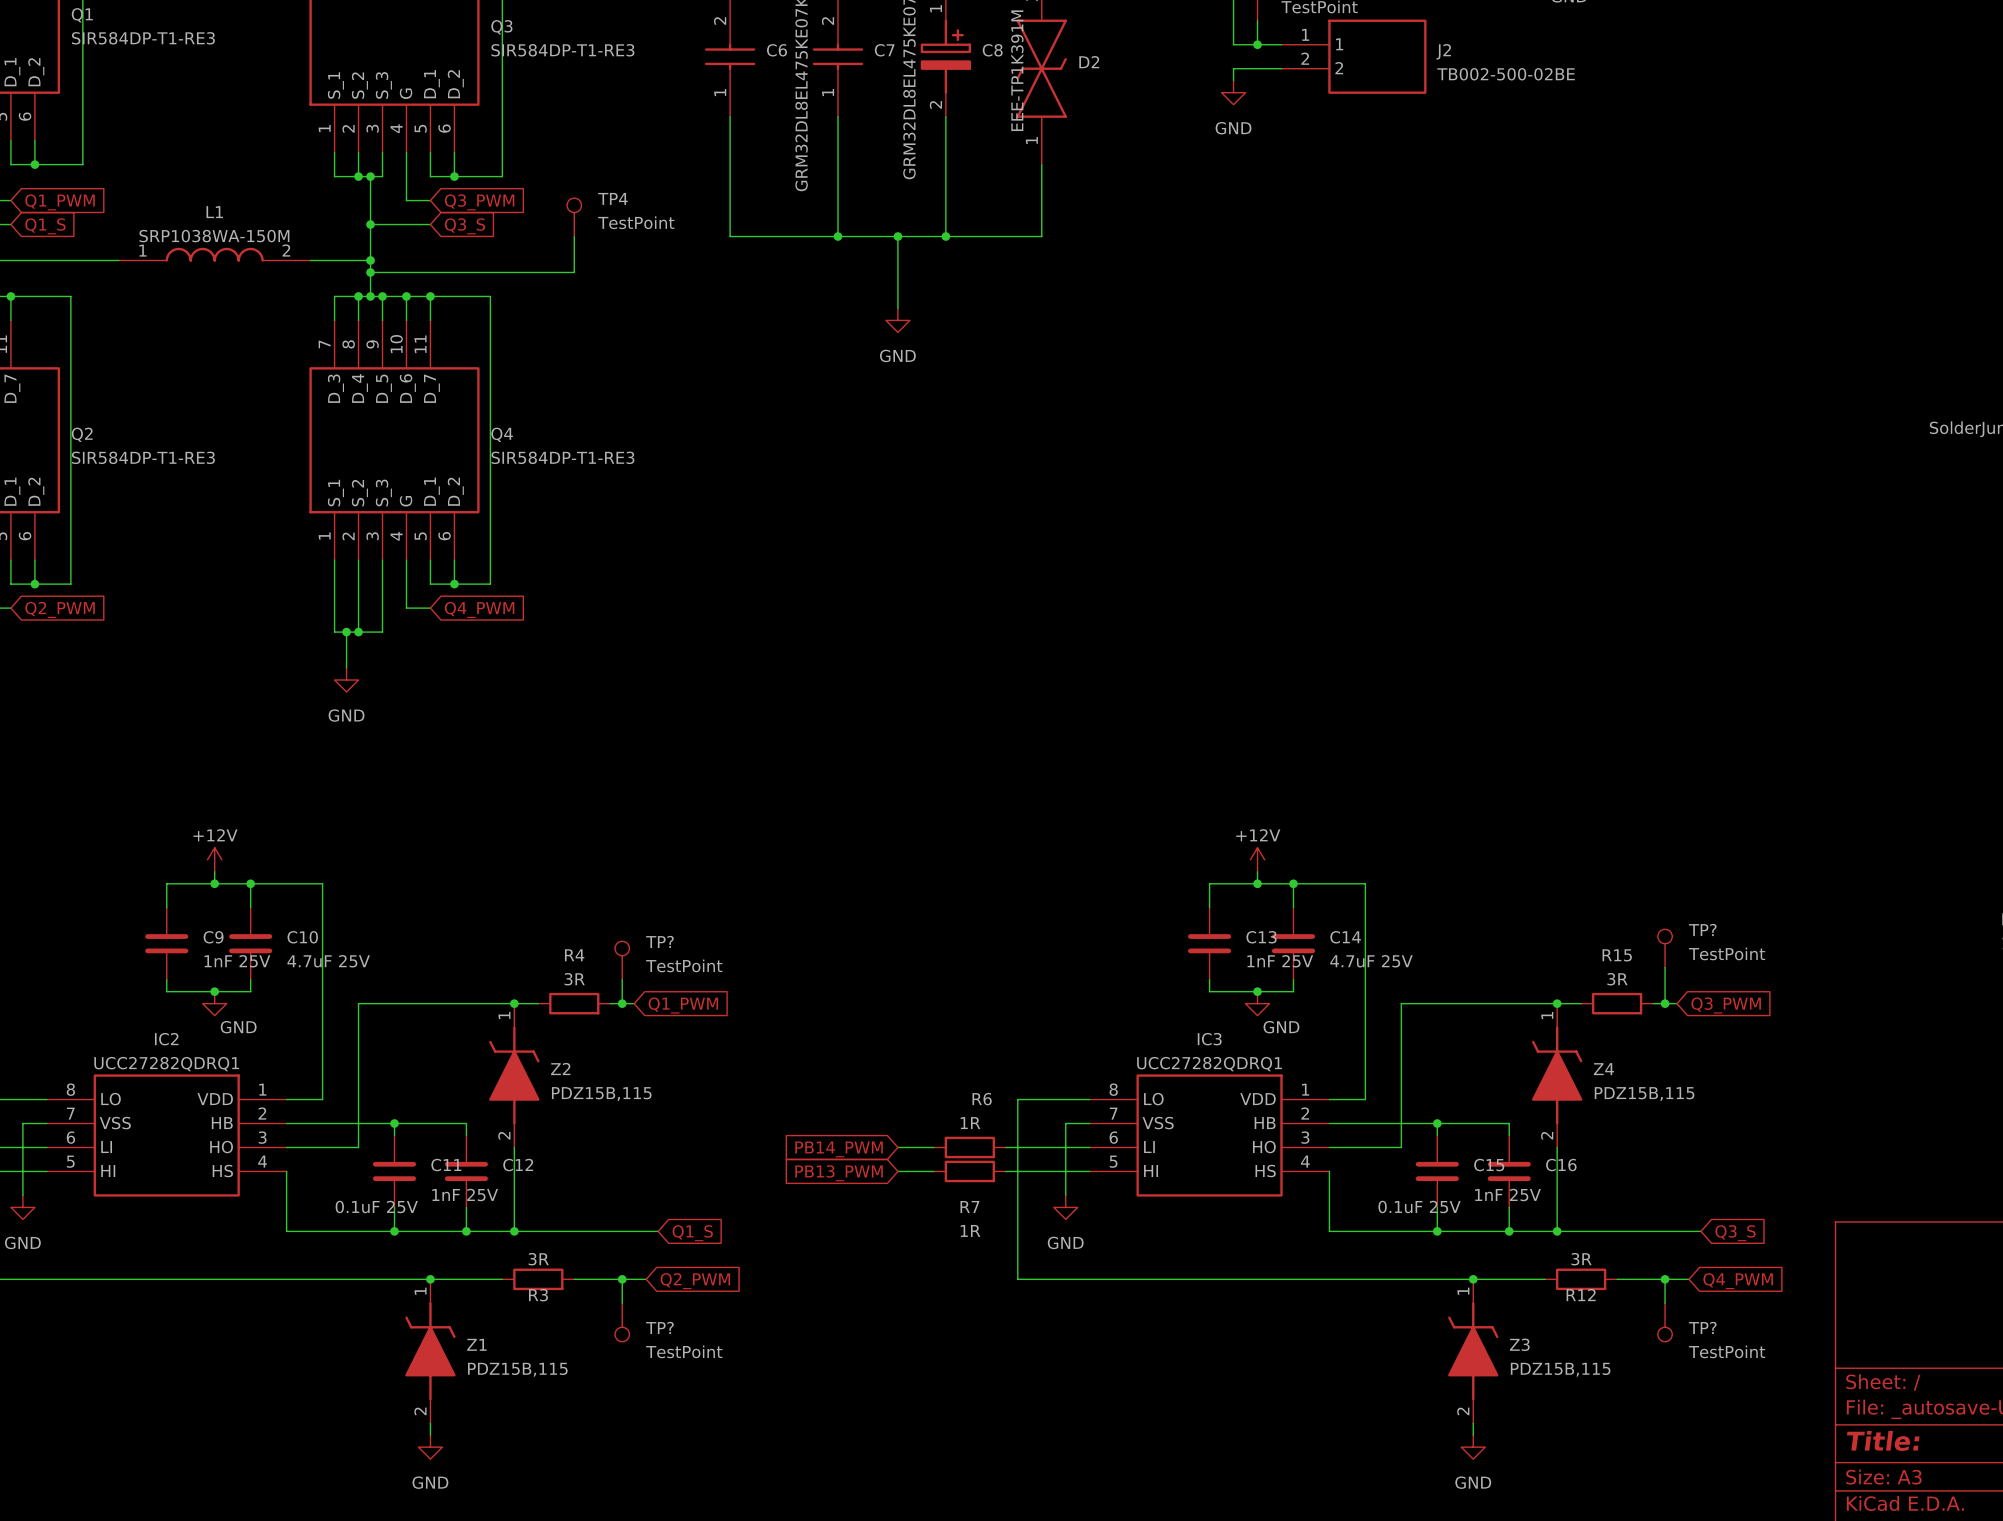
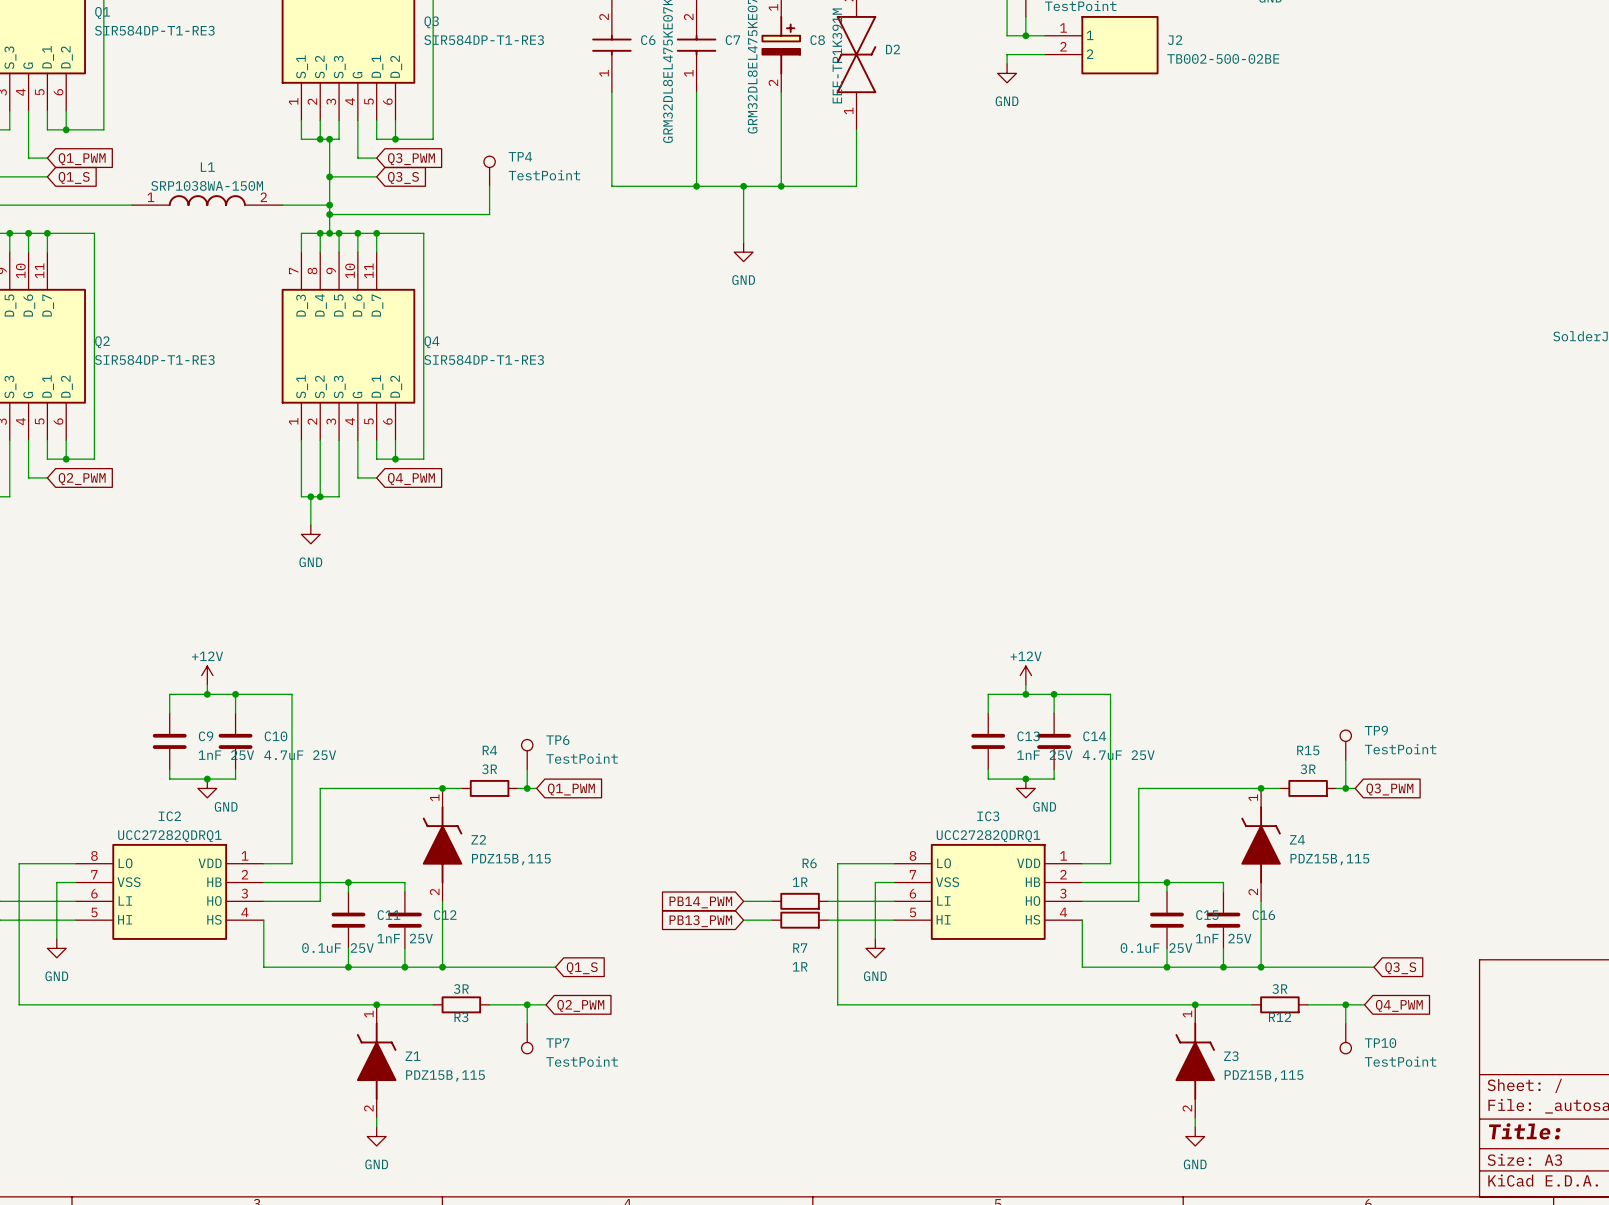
TP? name: TP? (1702, 929) -> TP9 (1376, 730)
TP? name: TP? (659, 941) -> TP6 (557, 740)
TP? name: TP? (659, 1327) -> TP7 (557, 1043)
TP? name: TP? (1702, 1327) -> TP10 (1380, 1043)

